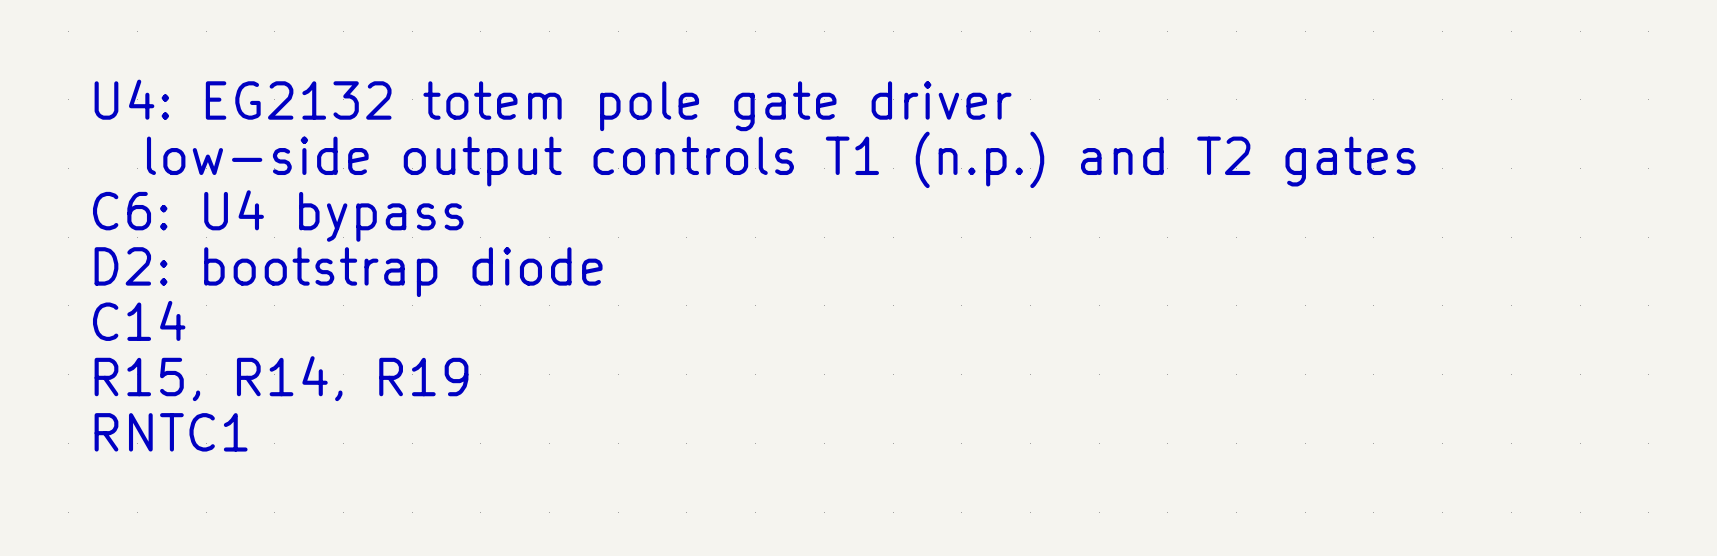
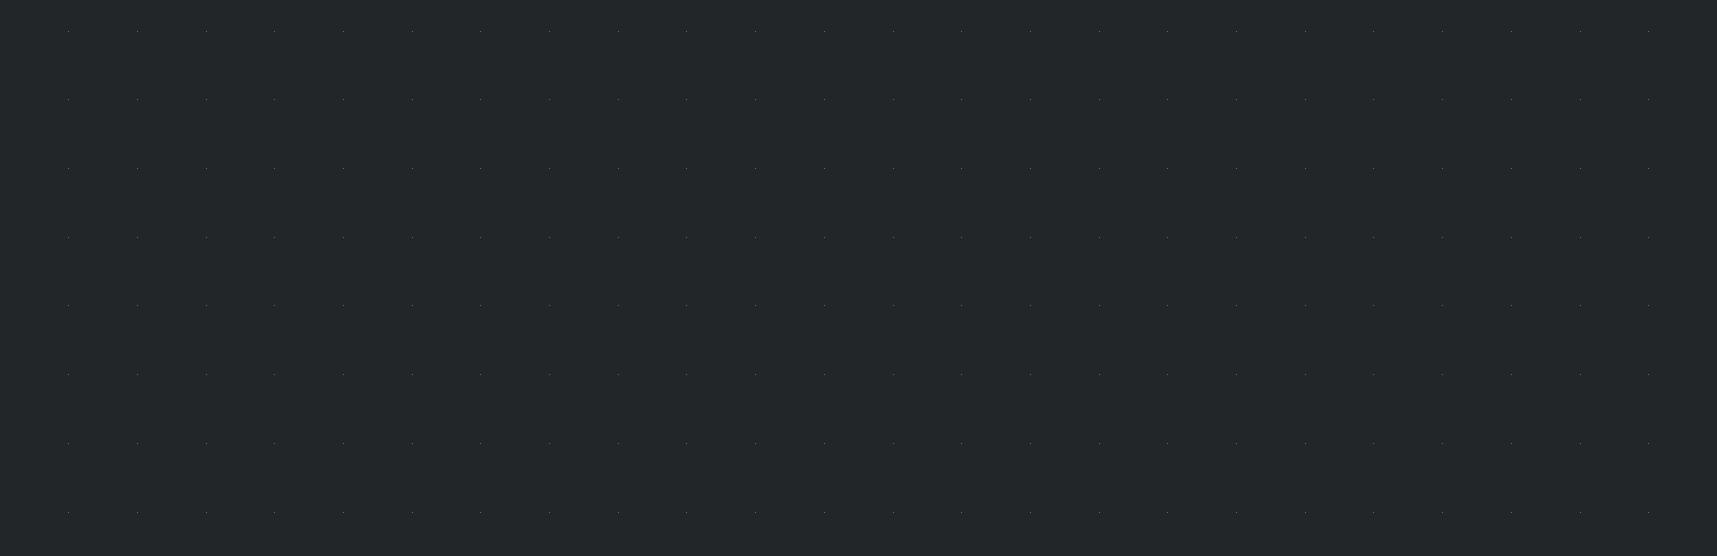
text: U4: EG2132 totem pole gate driver (553, 105) -> none
text: low-side output controls T1 (n.p.) and T2 gates (781, 159) -> none
text: C6: U4 bypass (278, 216) -> none
text: D2: bootstrap diode (348, 272) -> none
text: C14 (139, 320) -> none
text: R15, R14, R19 (281, 378) -> none
text: RNTC1 (171, 432) -> none

